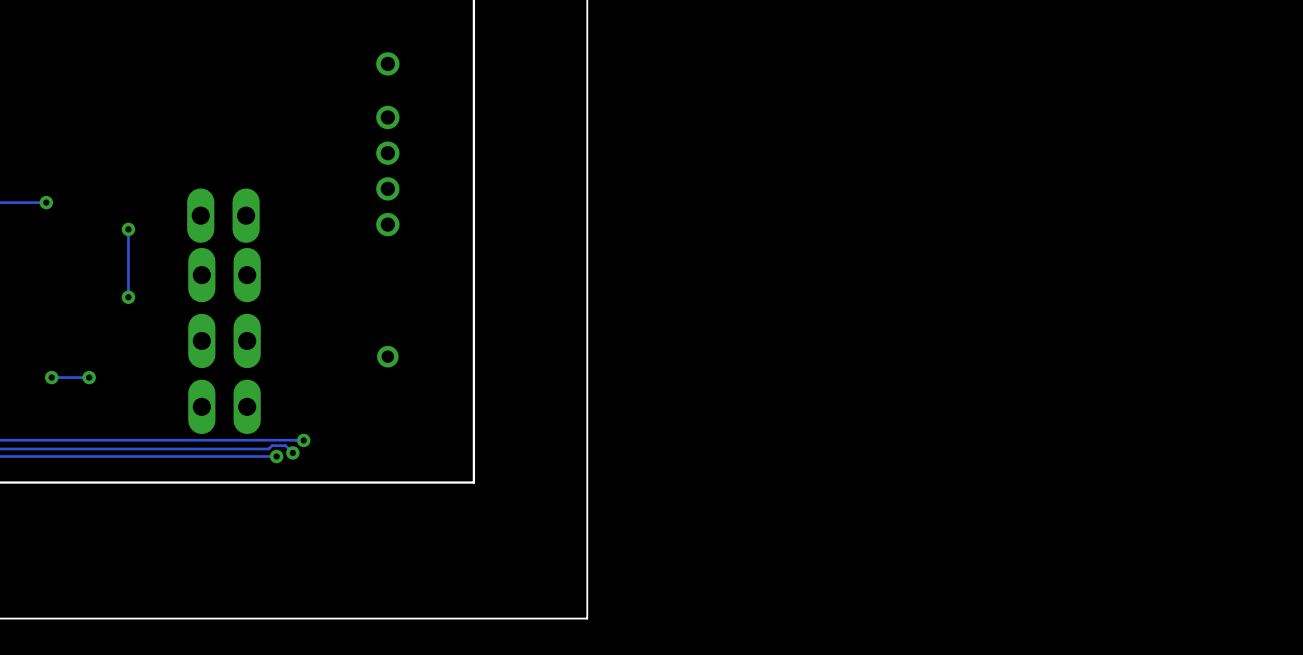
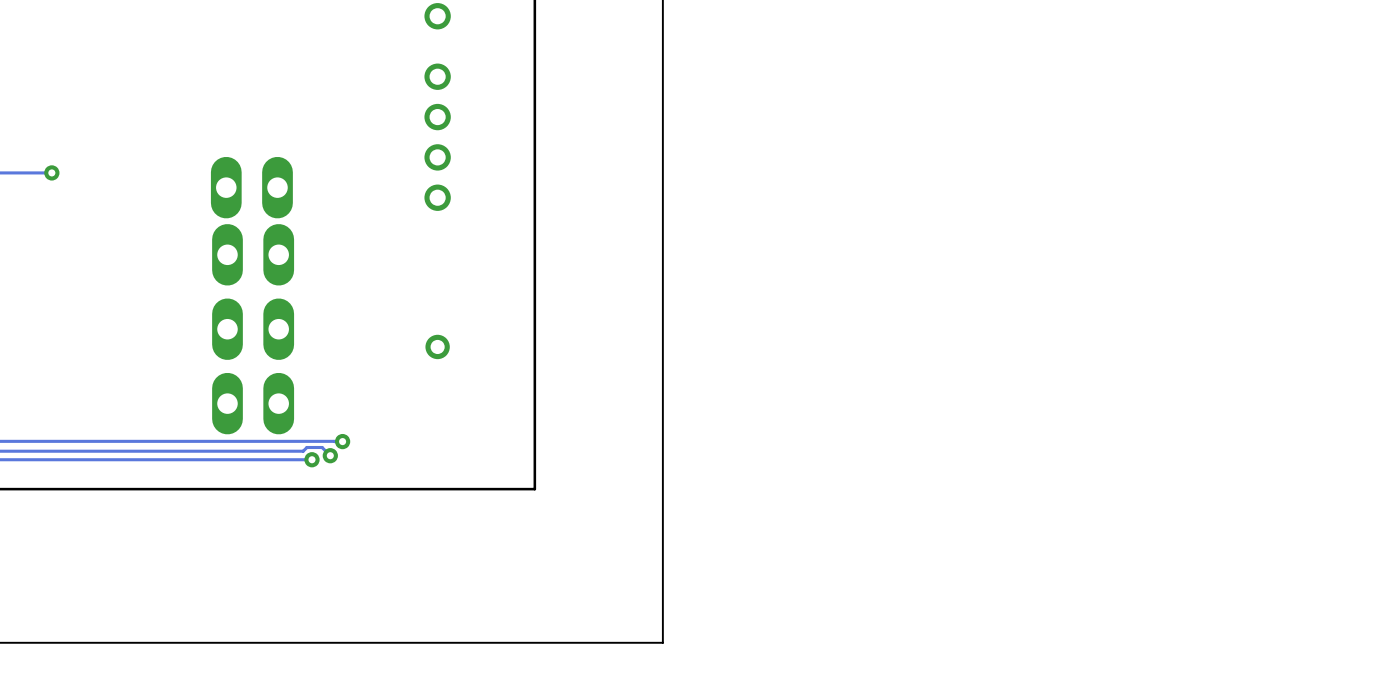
track: (128, 229) (128, 297) -> none
via: (128, 229) -> none
via: (128, 297) -> none
via: (51, 377) -> none
track: (89, 377) (51, 377) -> none
via: (89, 377) -> none

